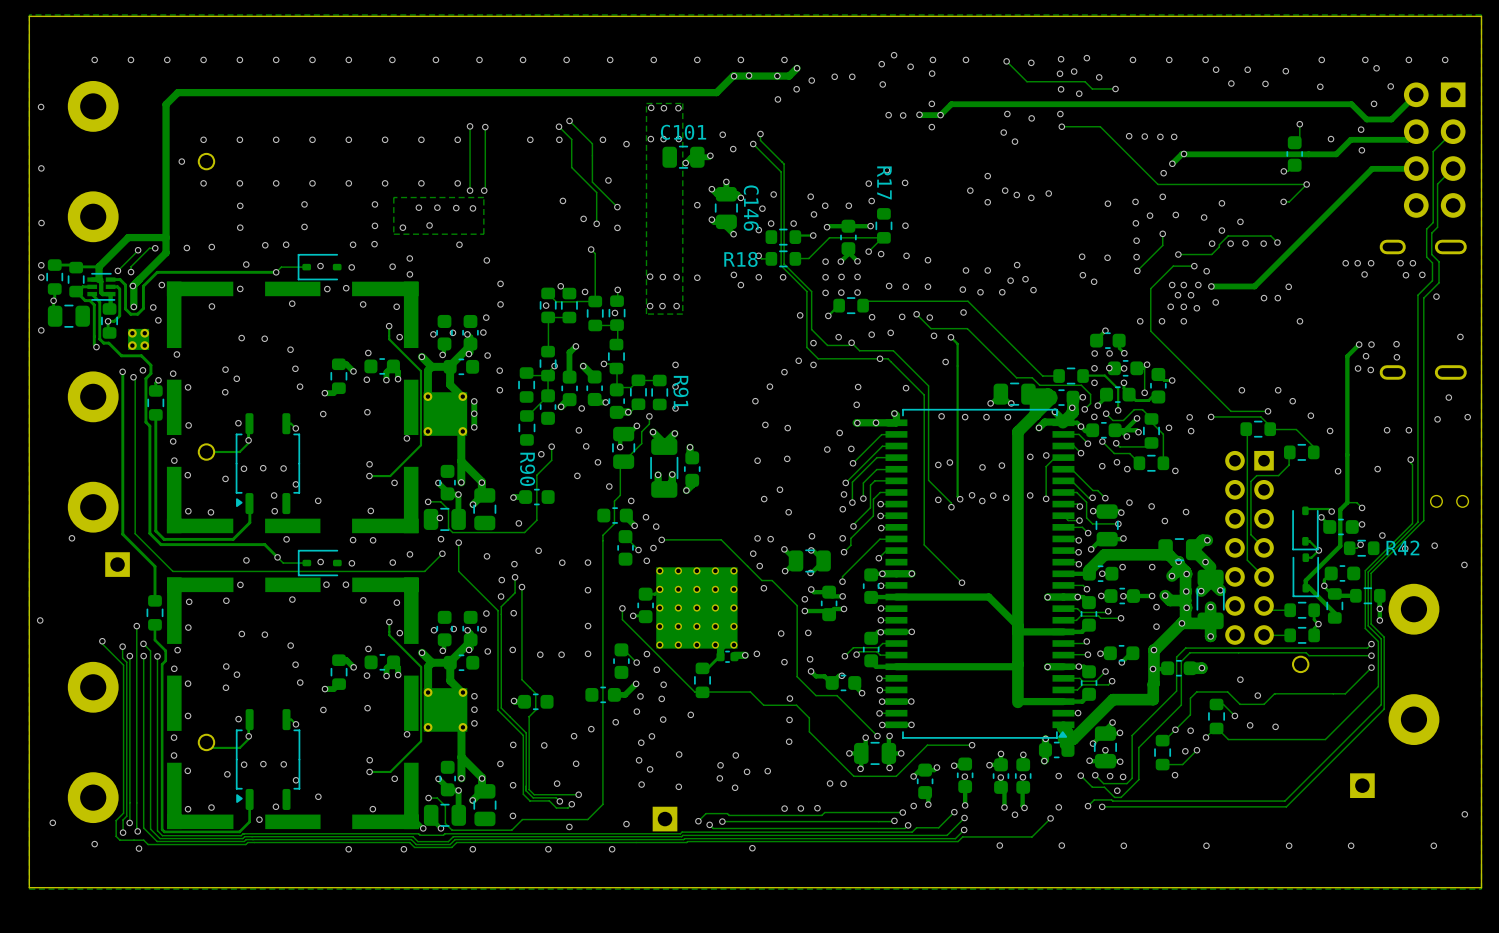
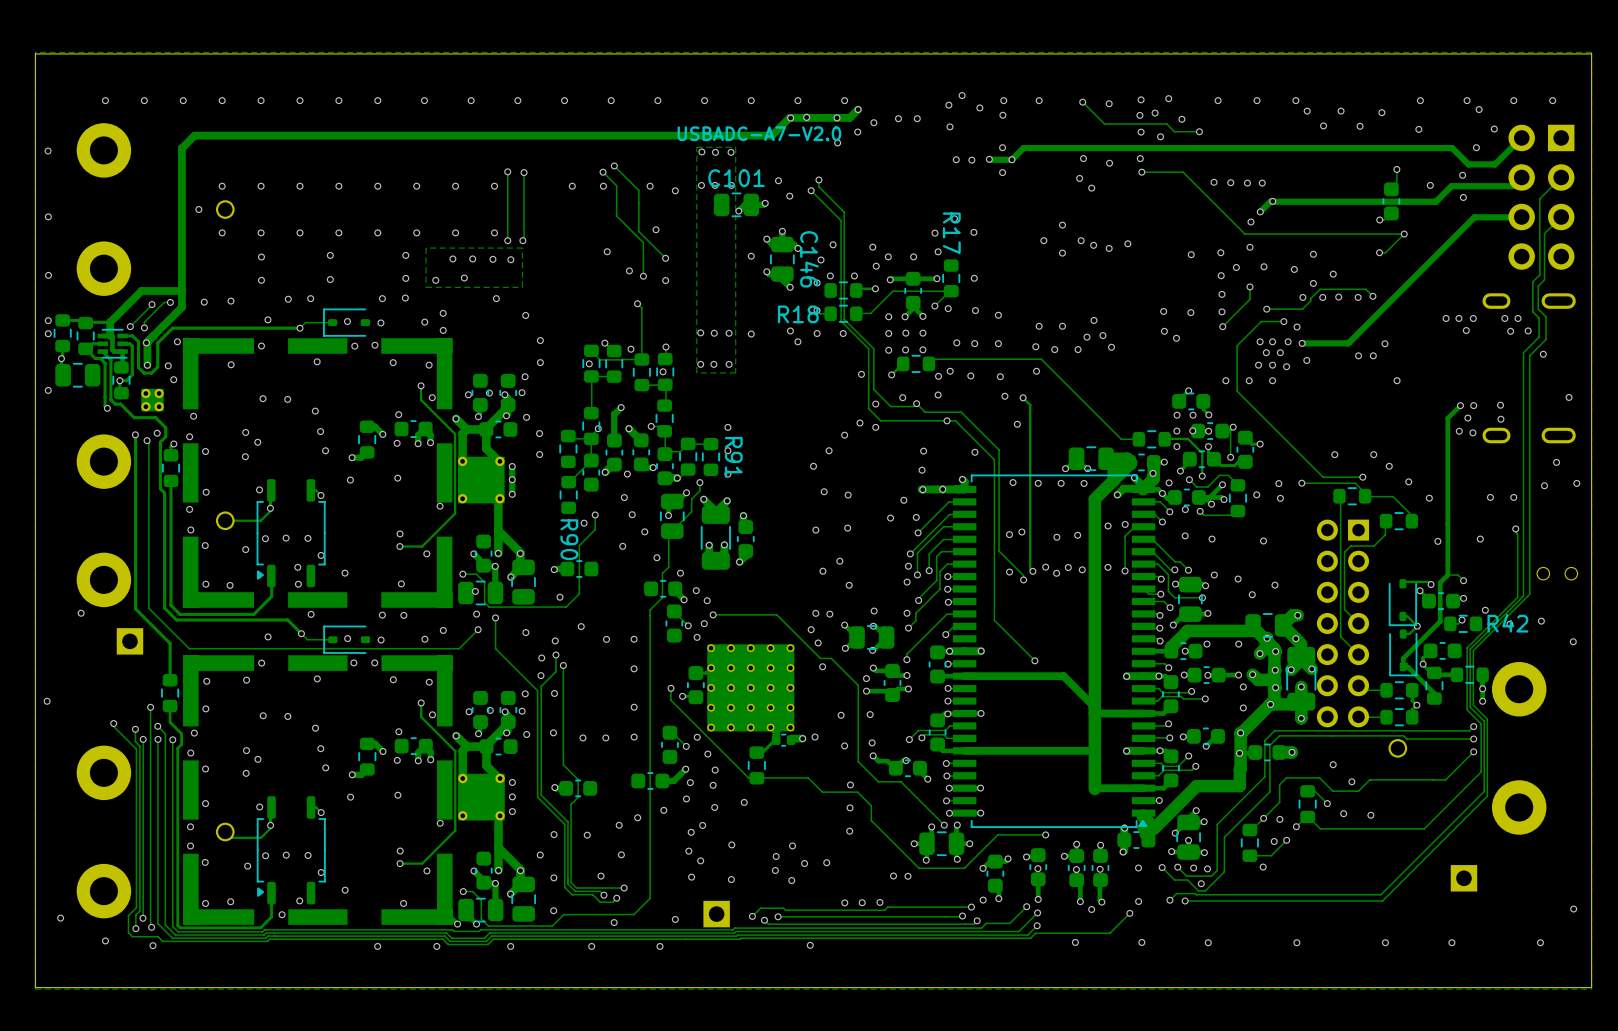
text: none -> USBADC-A7-V2.0 (759, 133)
via: none -> (950, 371)
track: (916, 314) (930, 328) (967, 328) (1016, 377) (1032, 377) (1039, 385) (1081, 385) (1090, 394) (1090, 403) (1084, 409) -> none
via: (916, 314) -> none
via: (890, 332) -> none
via: (1084, 409) -> none
via: none -> (1169, 482)
via: (1094, 416) -> none
track: (1149, 420) (1163, 434) (1163, 463) -> none
track: (1102, 441) (1114, 453) (1129, 453) (1139, 463) -> none
via: (1116, 462) -> none
part: (1151, 463) -> none

